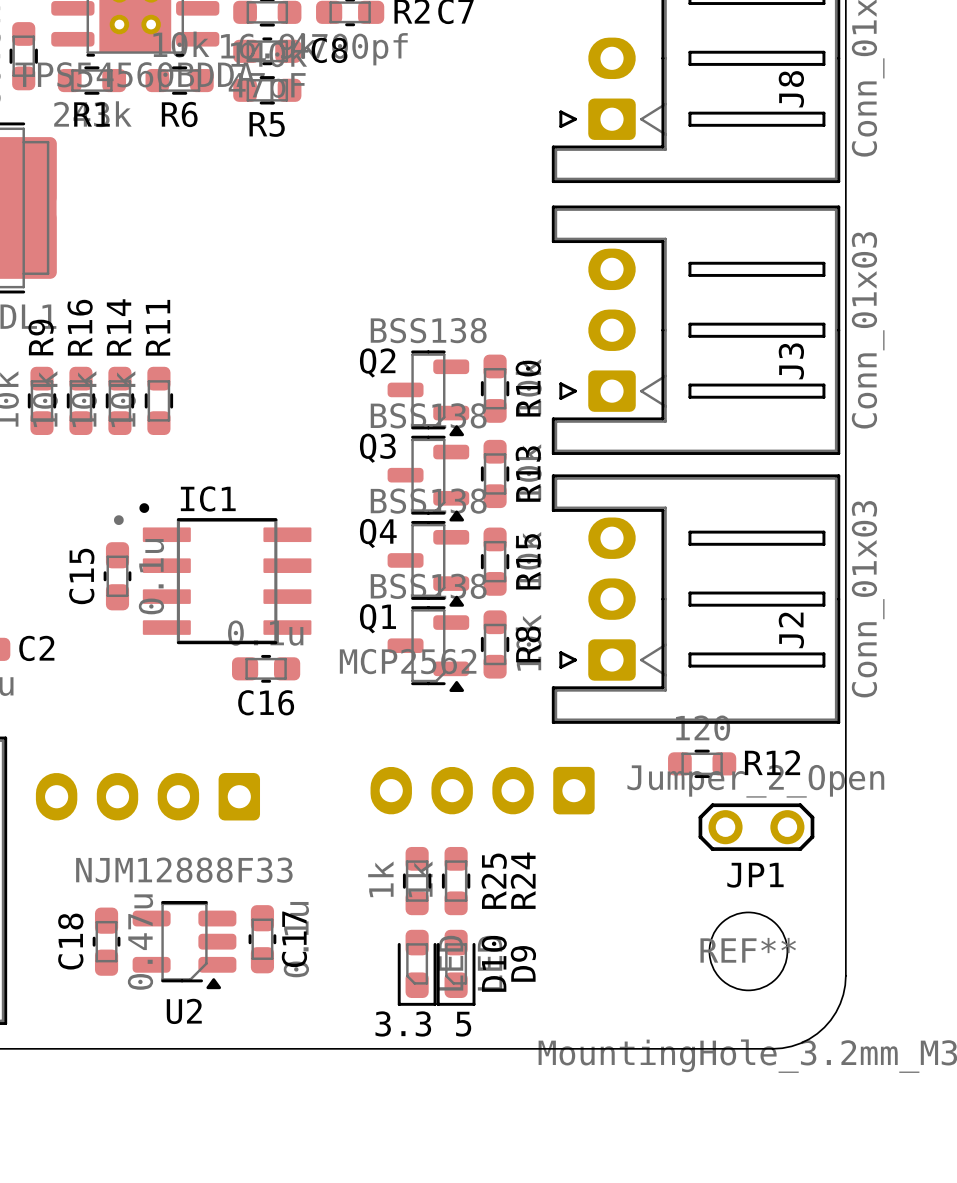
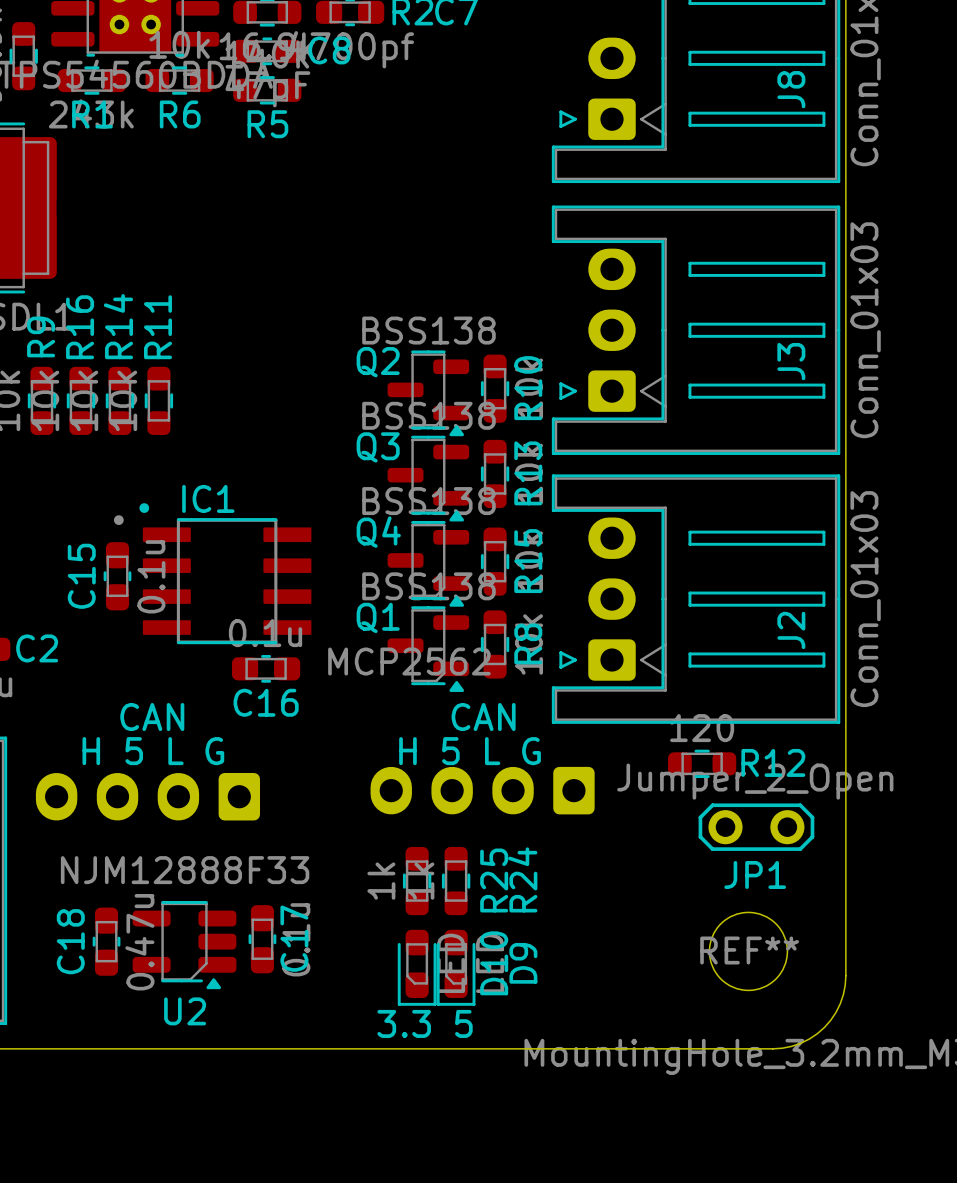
text: none -> CAN (152, 717)
text: none -> CAN (483, 717)
text: none -> H 5 L G (153, 751)
text: none -> H 5 L G (470, 751)

